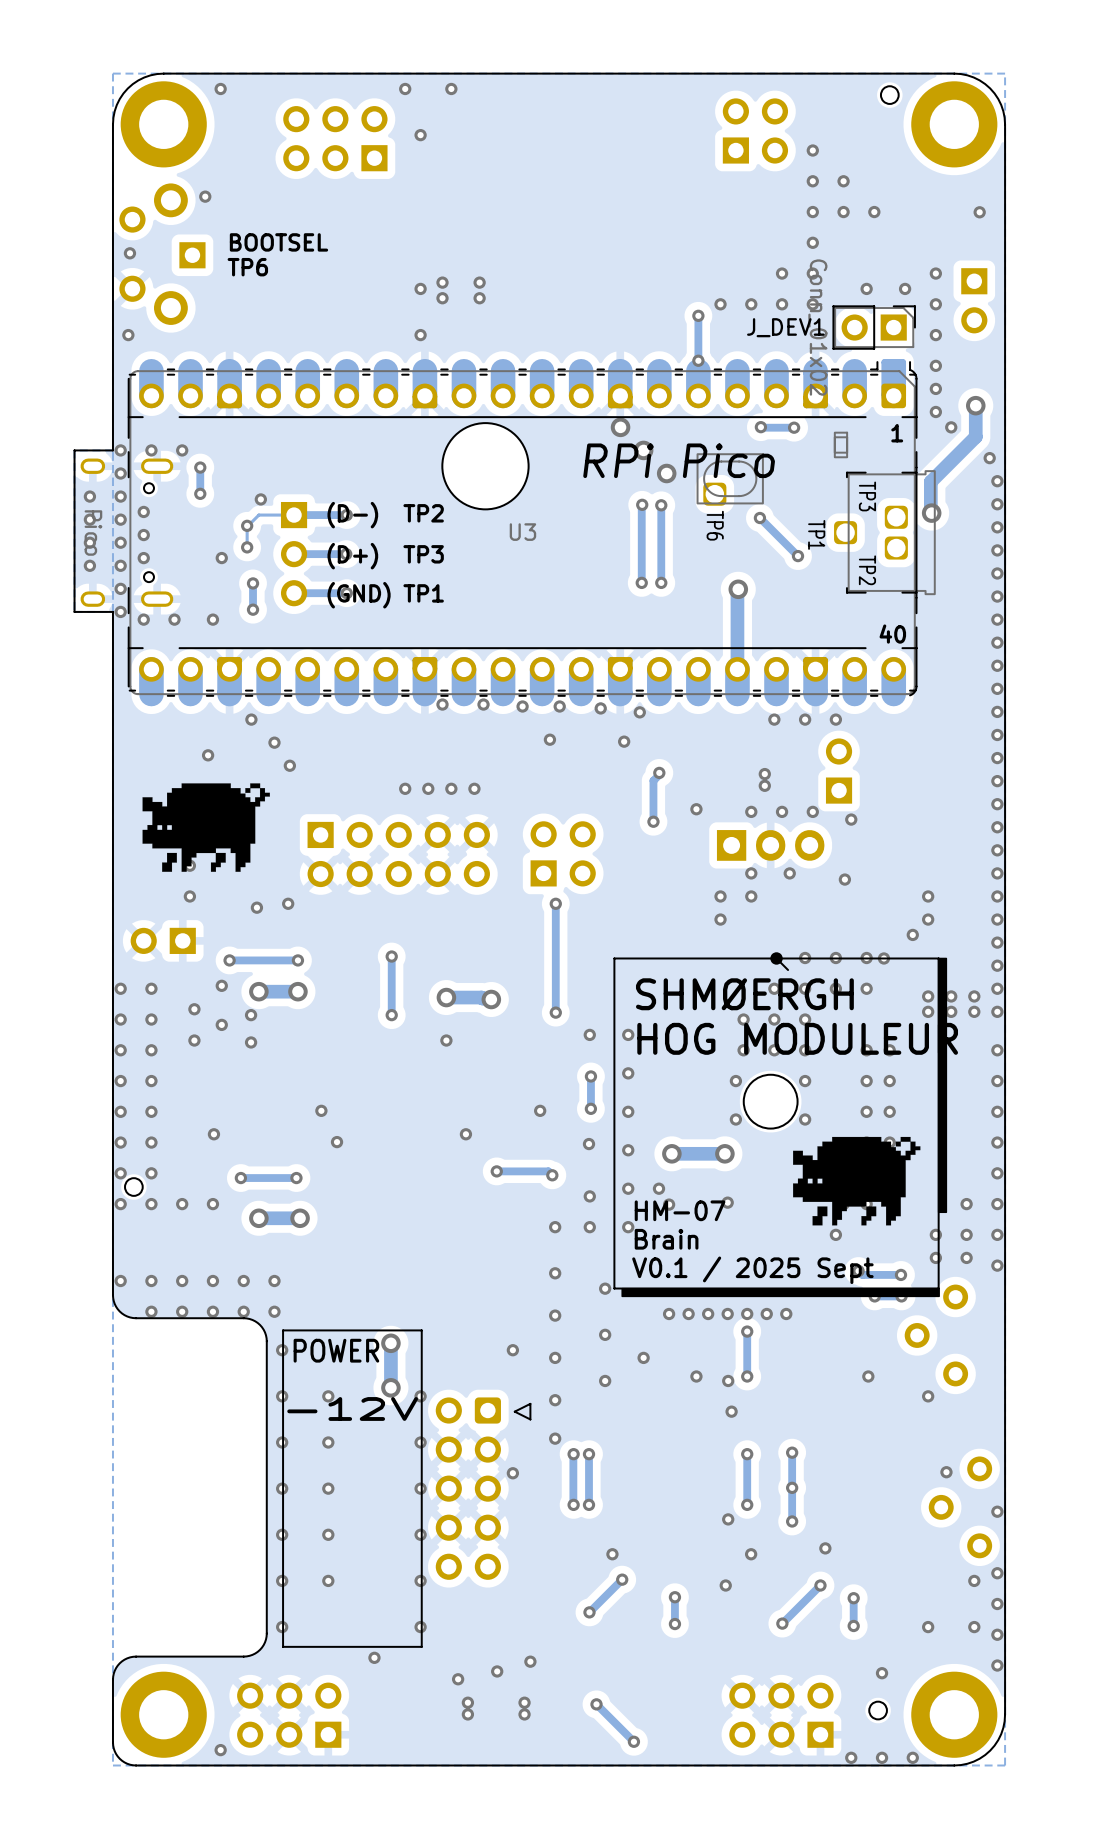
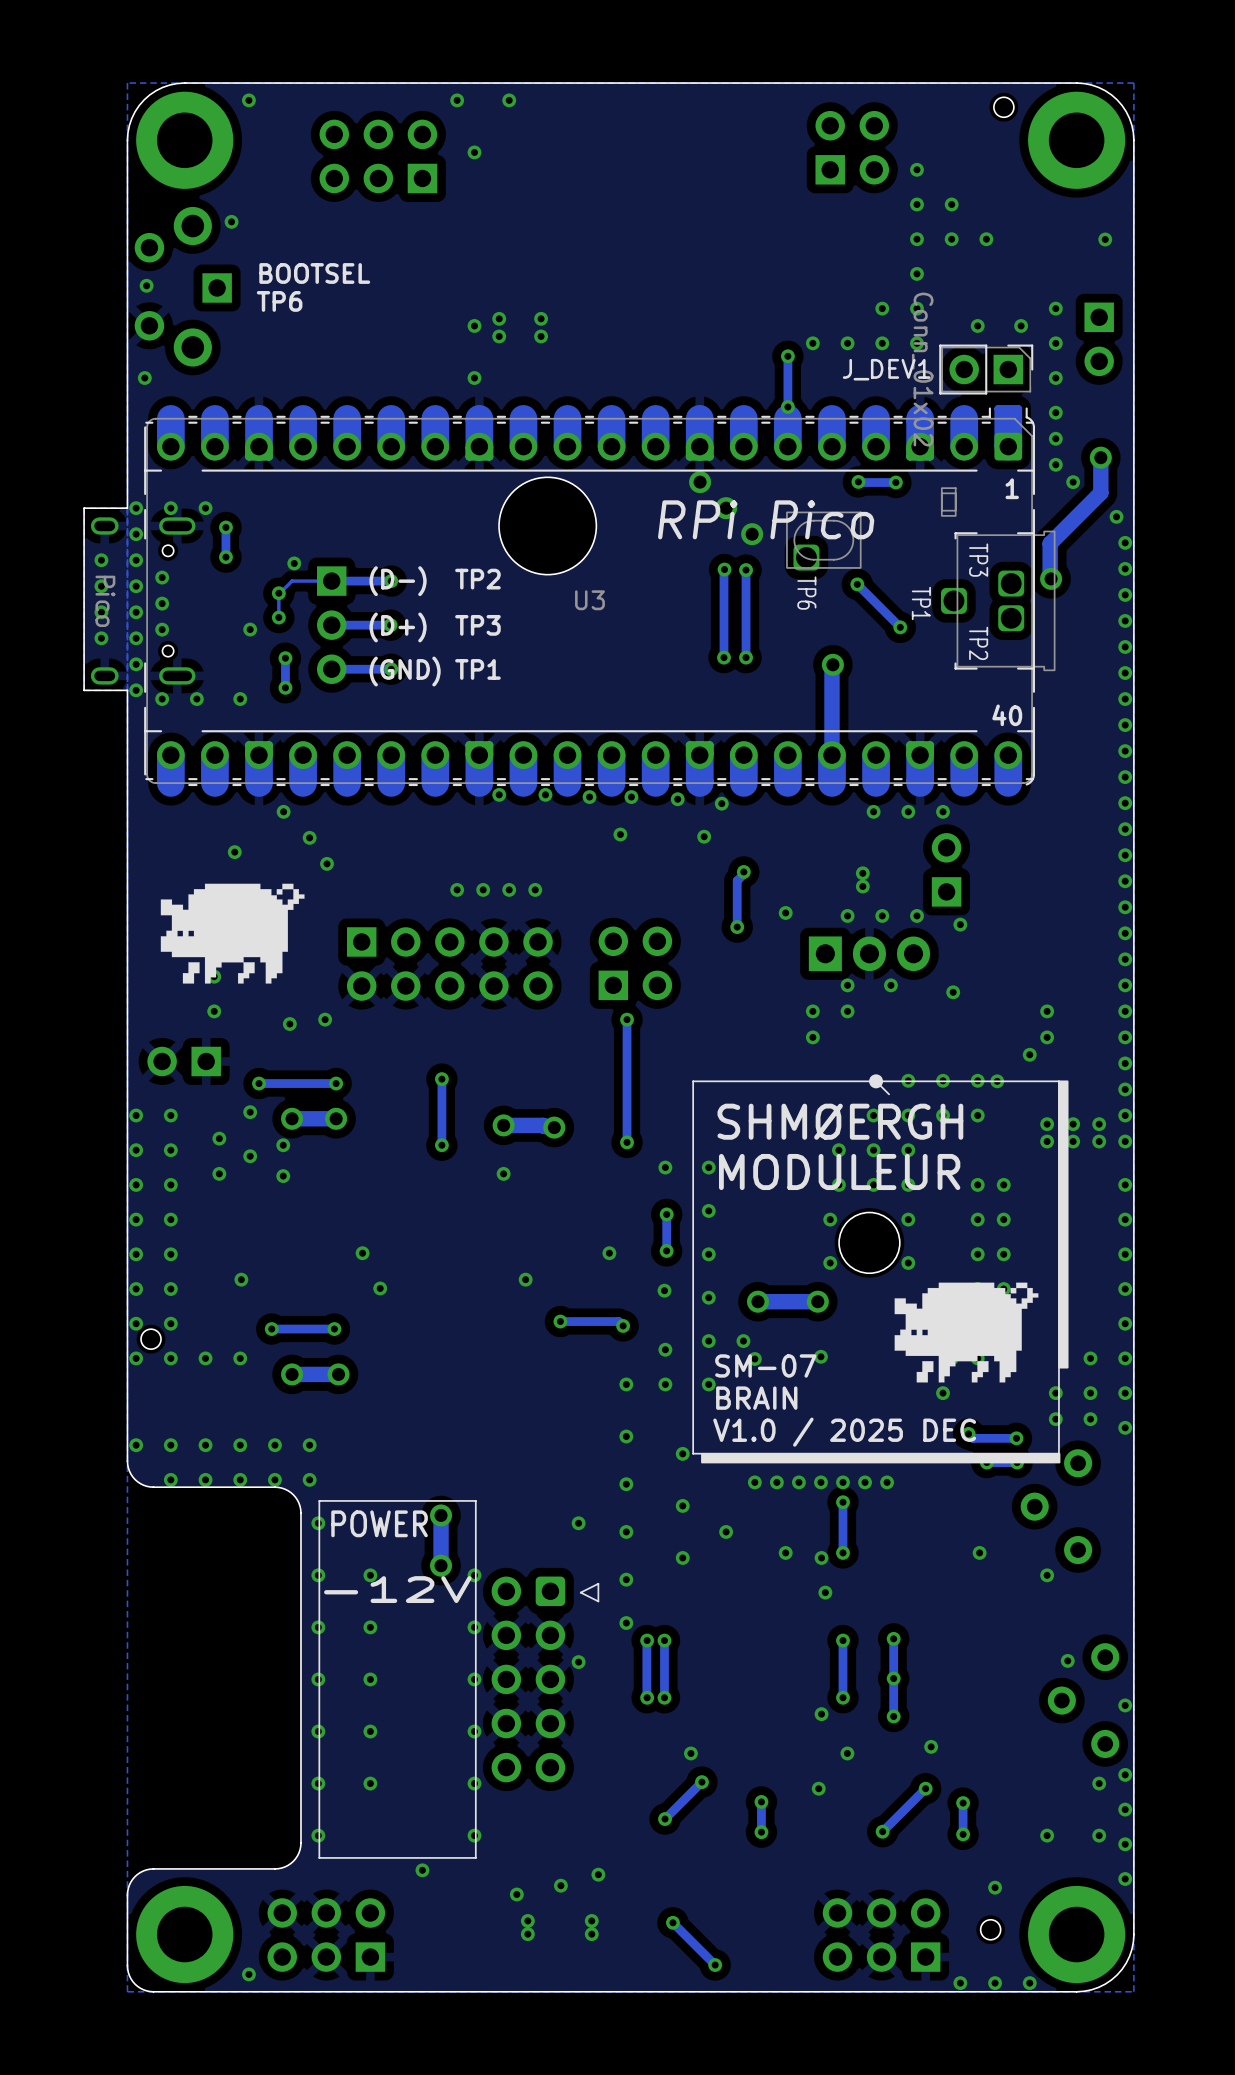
text: HOG MODULEUR (797, 1038) -> MODULEUR (839, 1171)
text: HM-07 (680, 1210) -> SM-07 (765, 1365)
text: Brain (666, 1239) -> BRAIN (756, 1398)
text: V0.1 / 2025 Sept (752, 1270) -> V1.0 / 2025 DEC (844, 1432)

